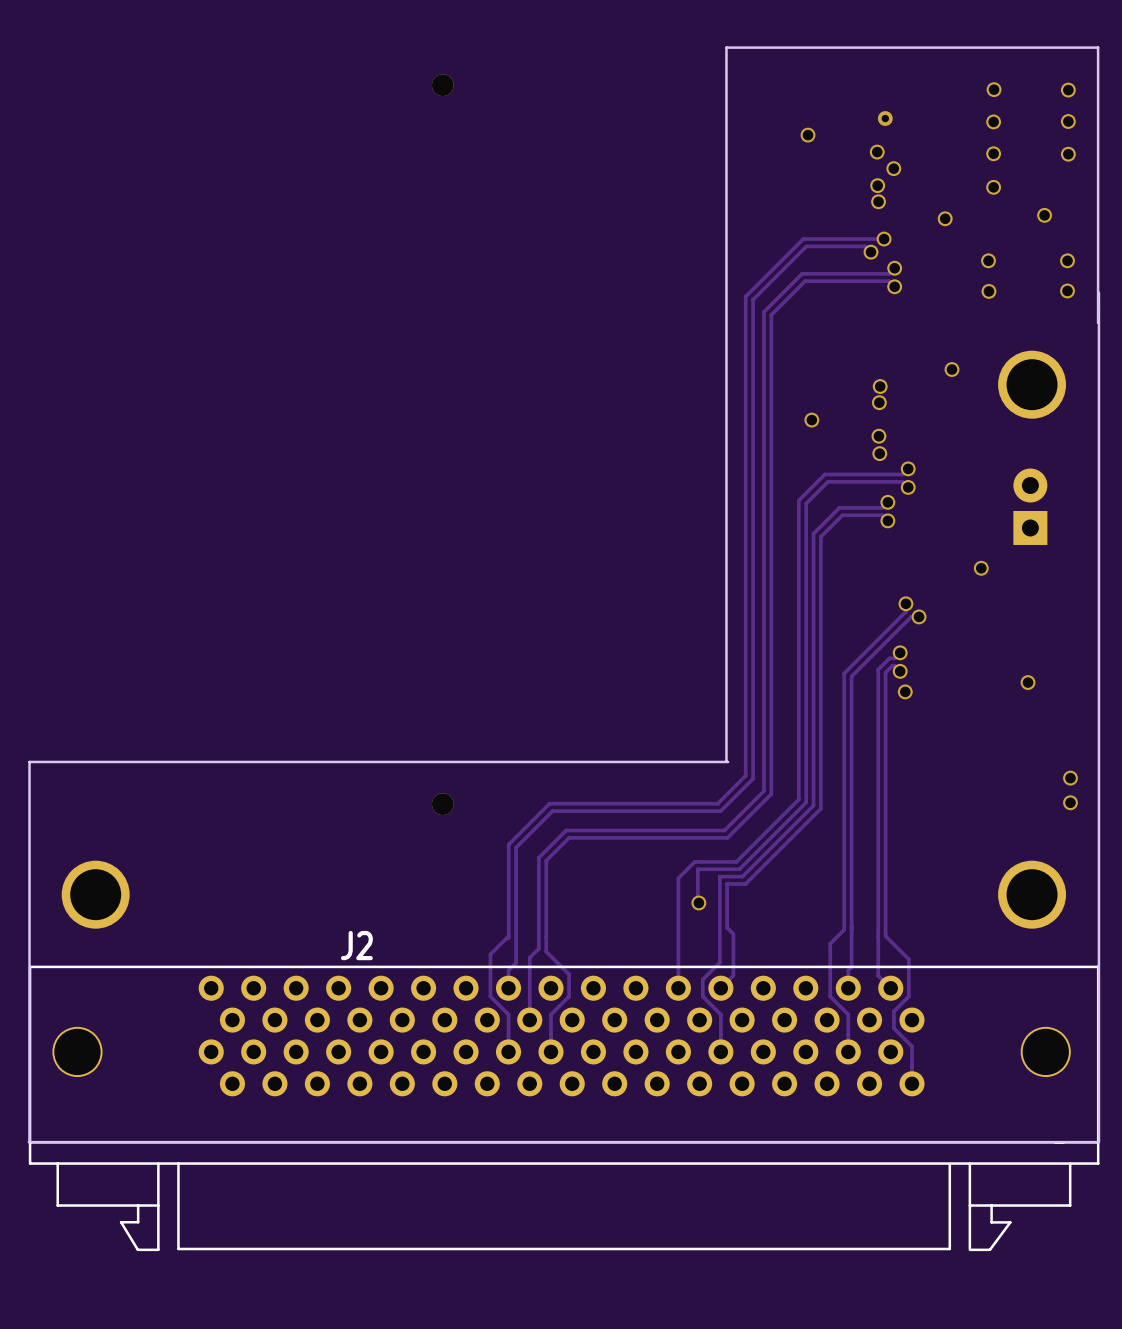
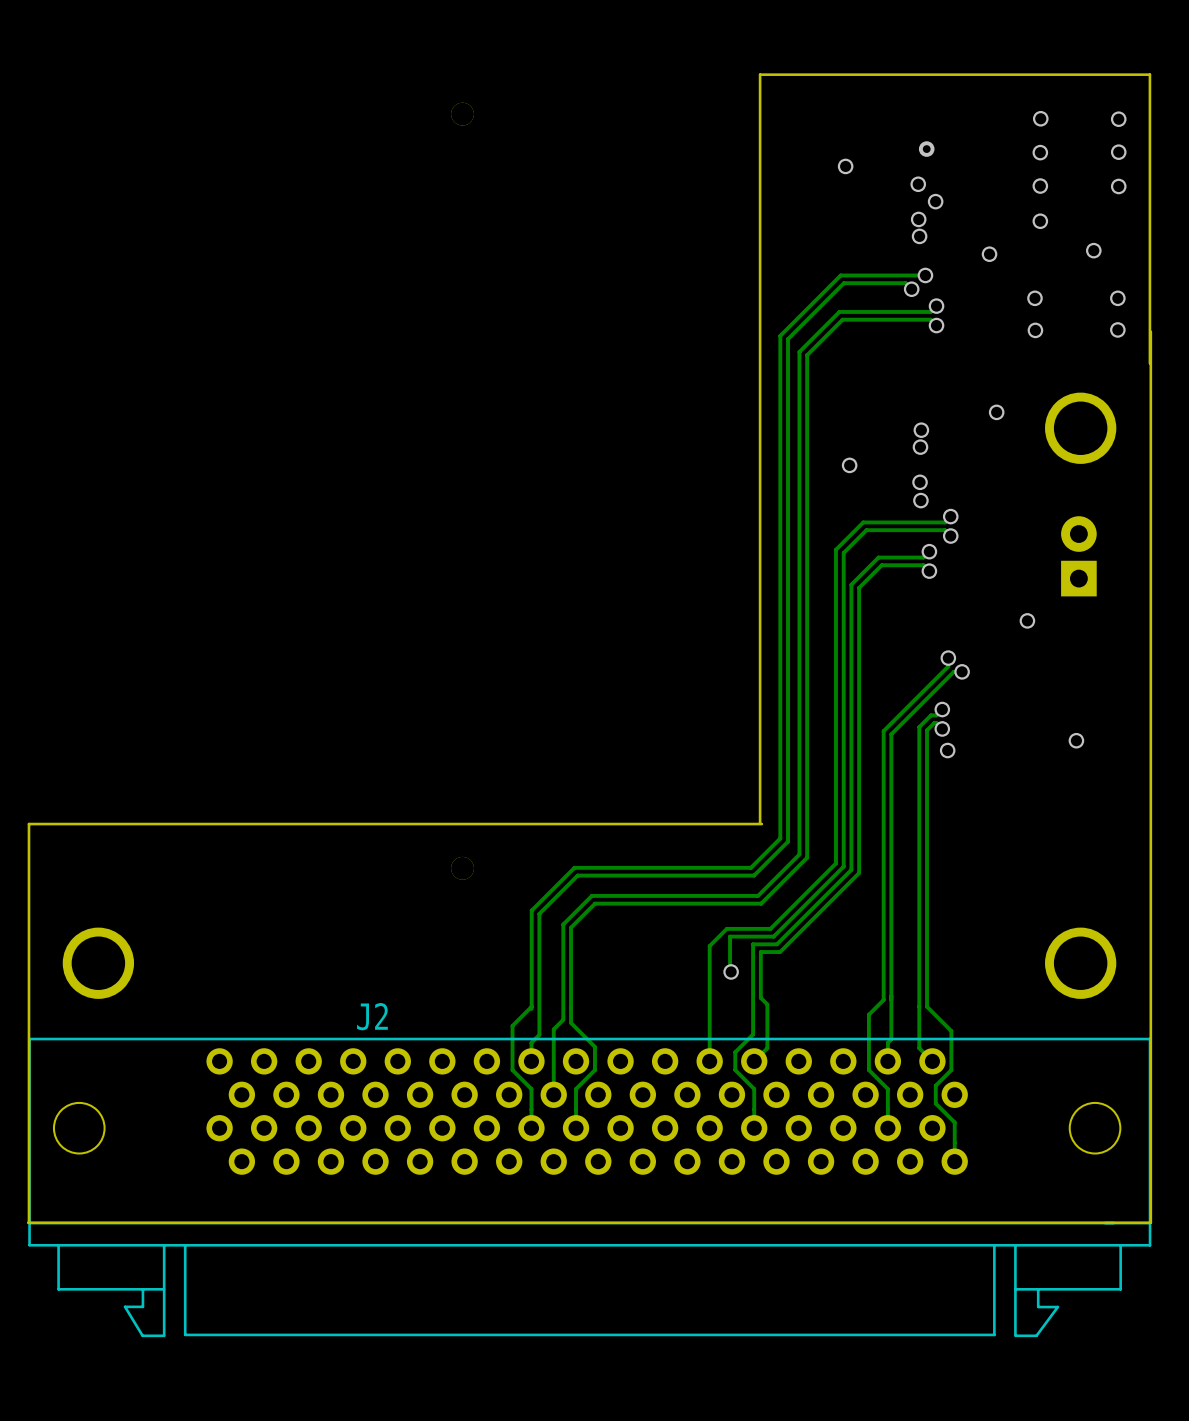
via: (1070, 778) -> none
via: (1070, 802) -> none

